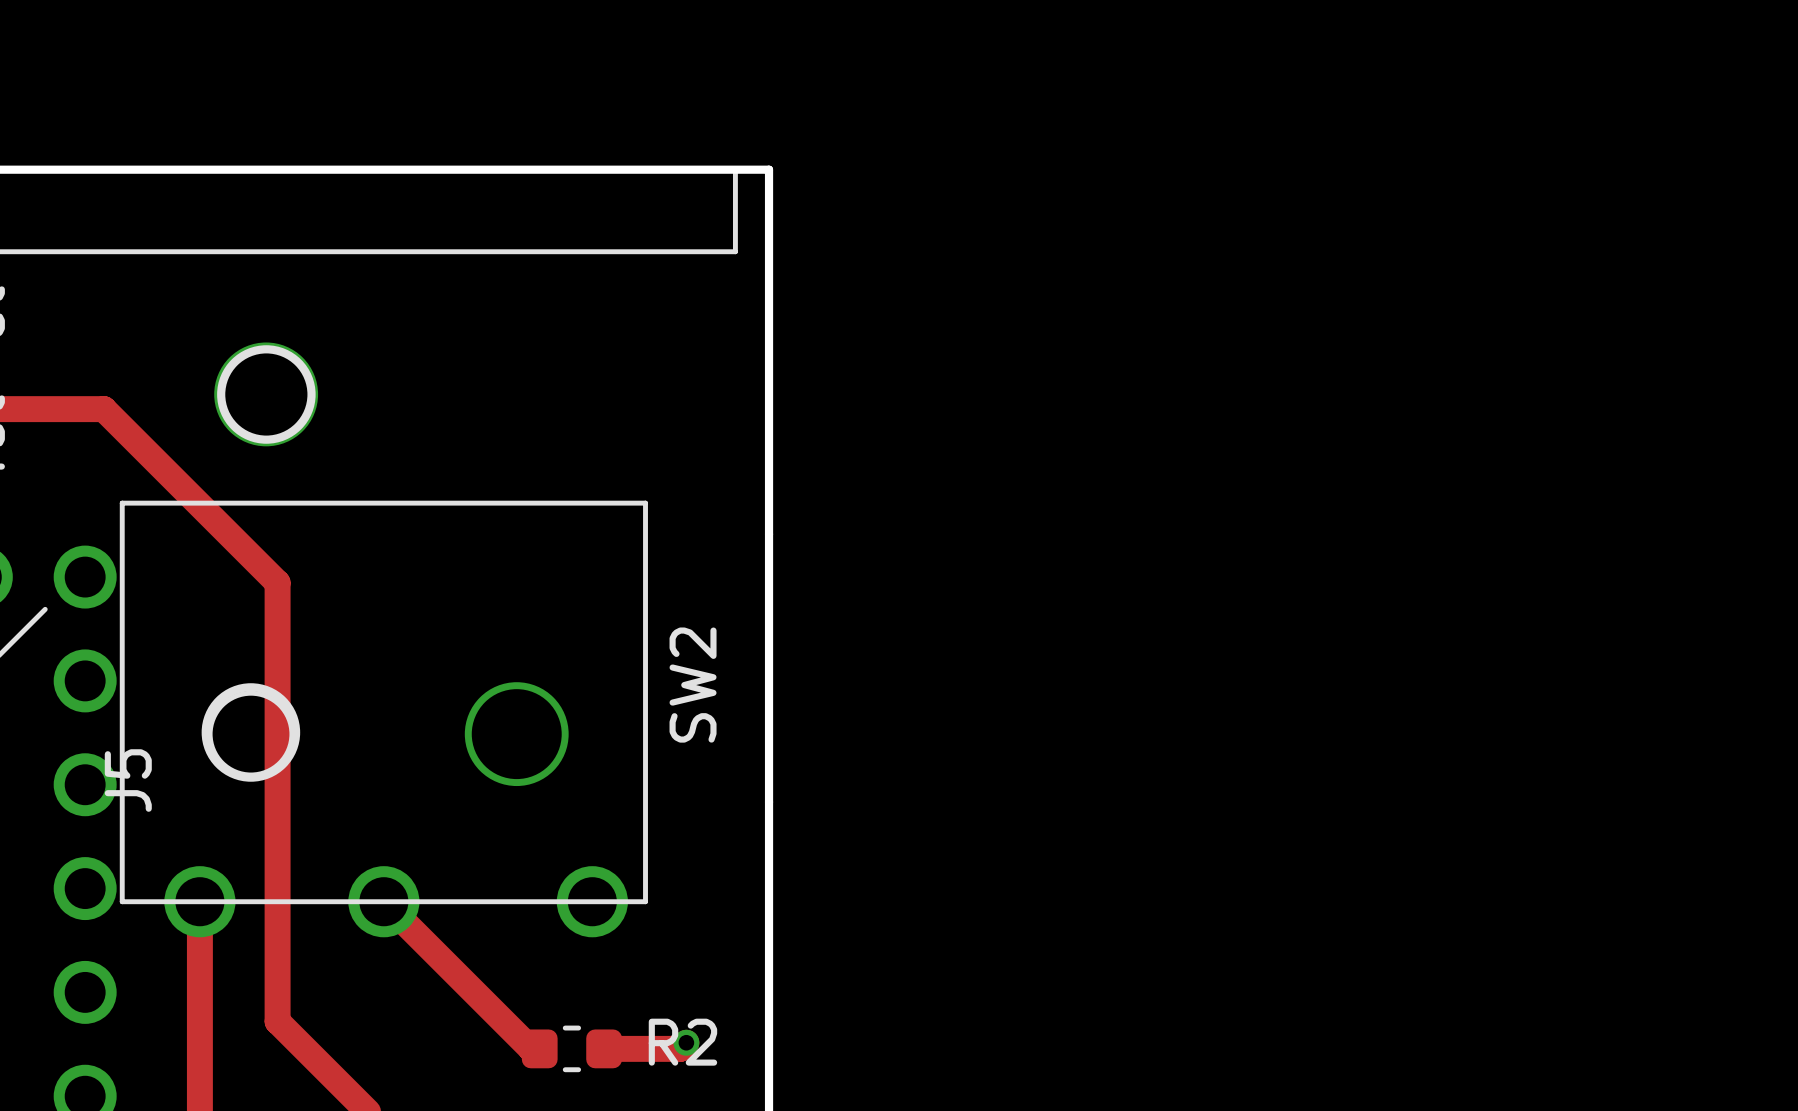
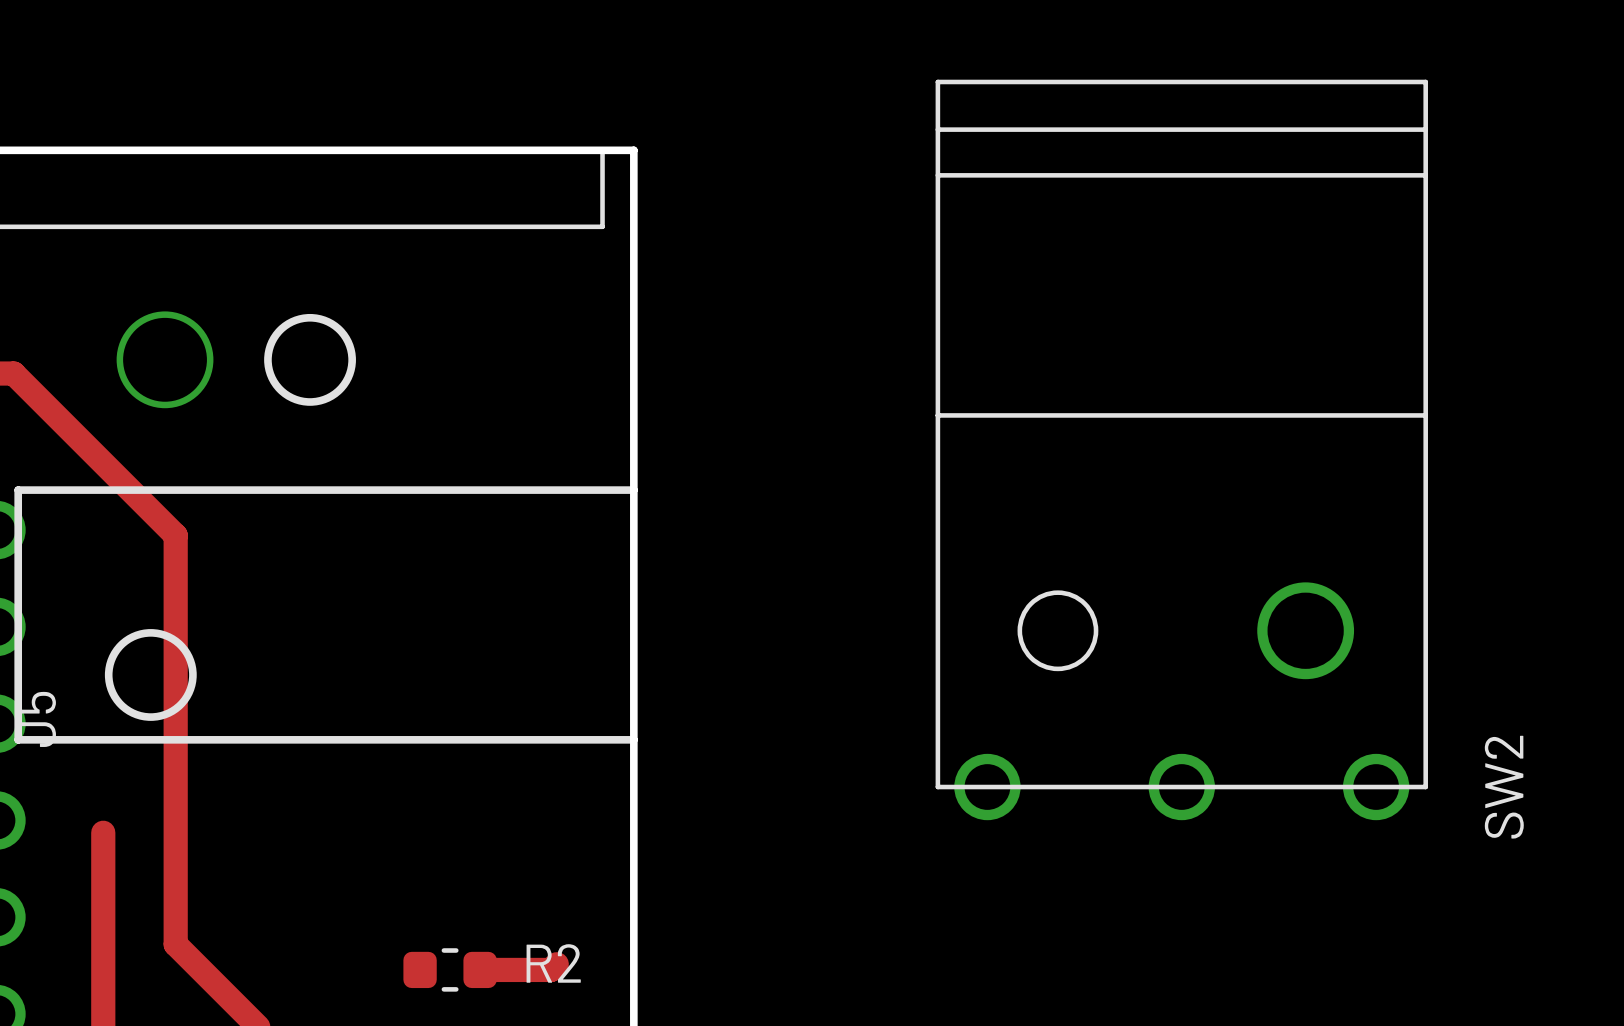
drawing position: (266, 394) -> (310, 359)
SW2 footprint: [119, 500, 648, 938] -> [935, 79, 1428, 821]
line: none -> (633, 490) (18, 490) (18, 739) (633, 739)
SW2 name position: SW2 (693, 685) -> SW2 (1504, 787)
track: (383, 901) (531, 1048) (539, 1048) -> none
via: (686, 1042) -> none

